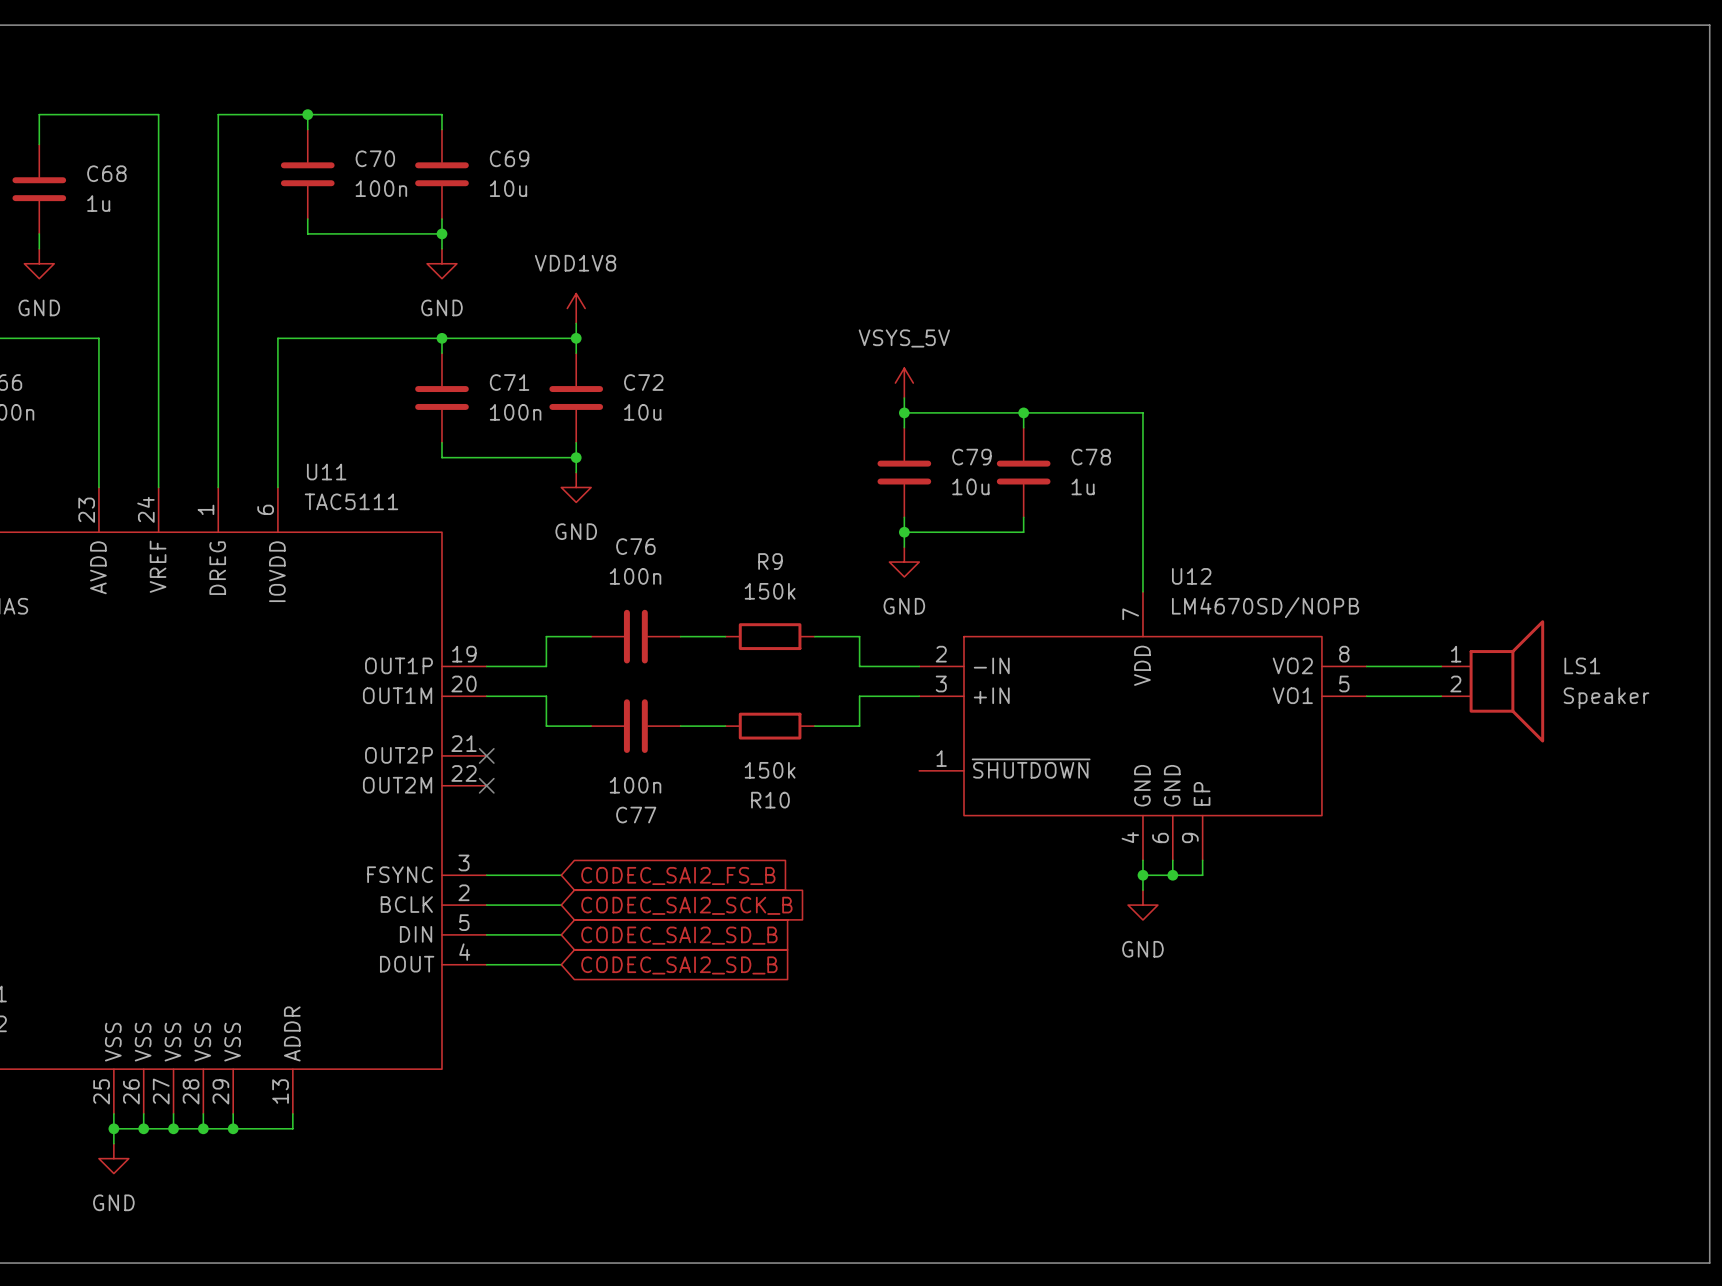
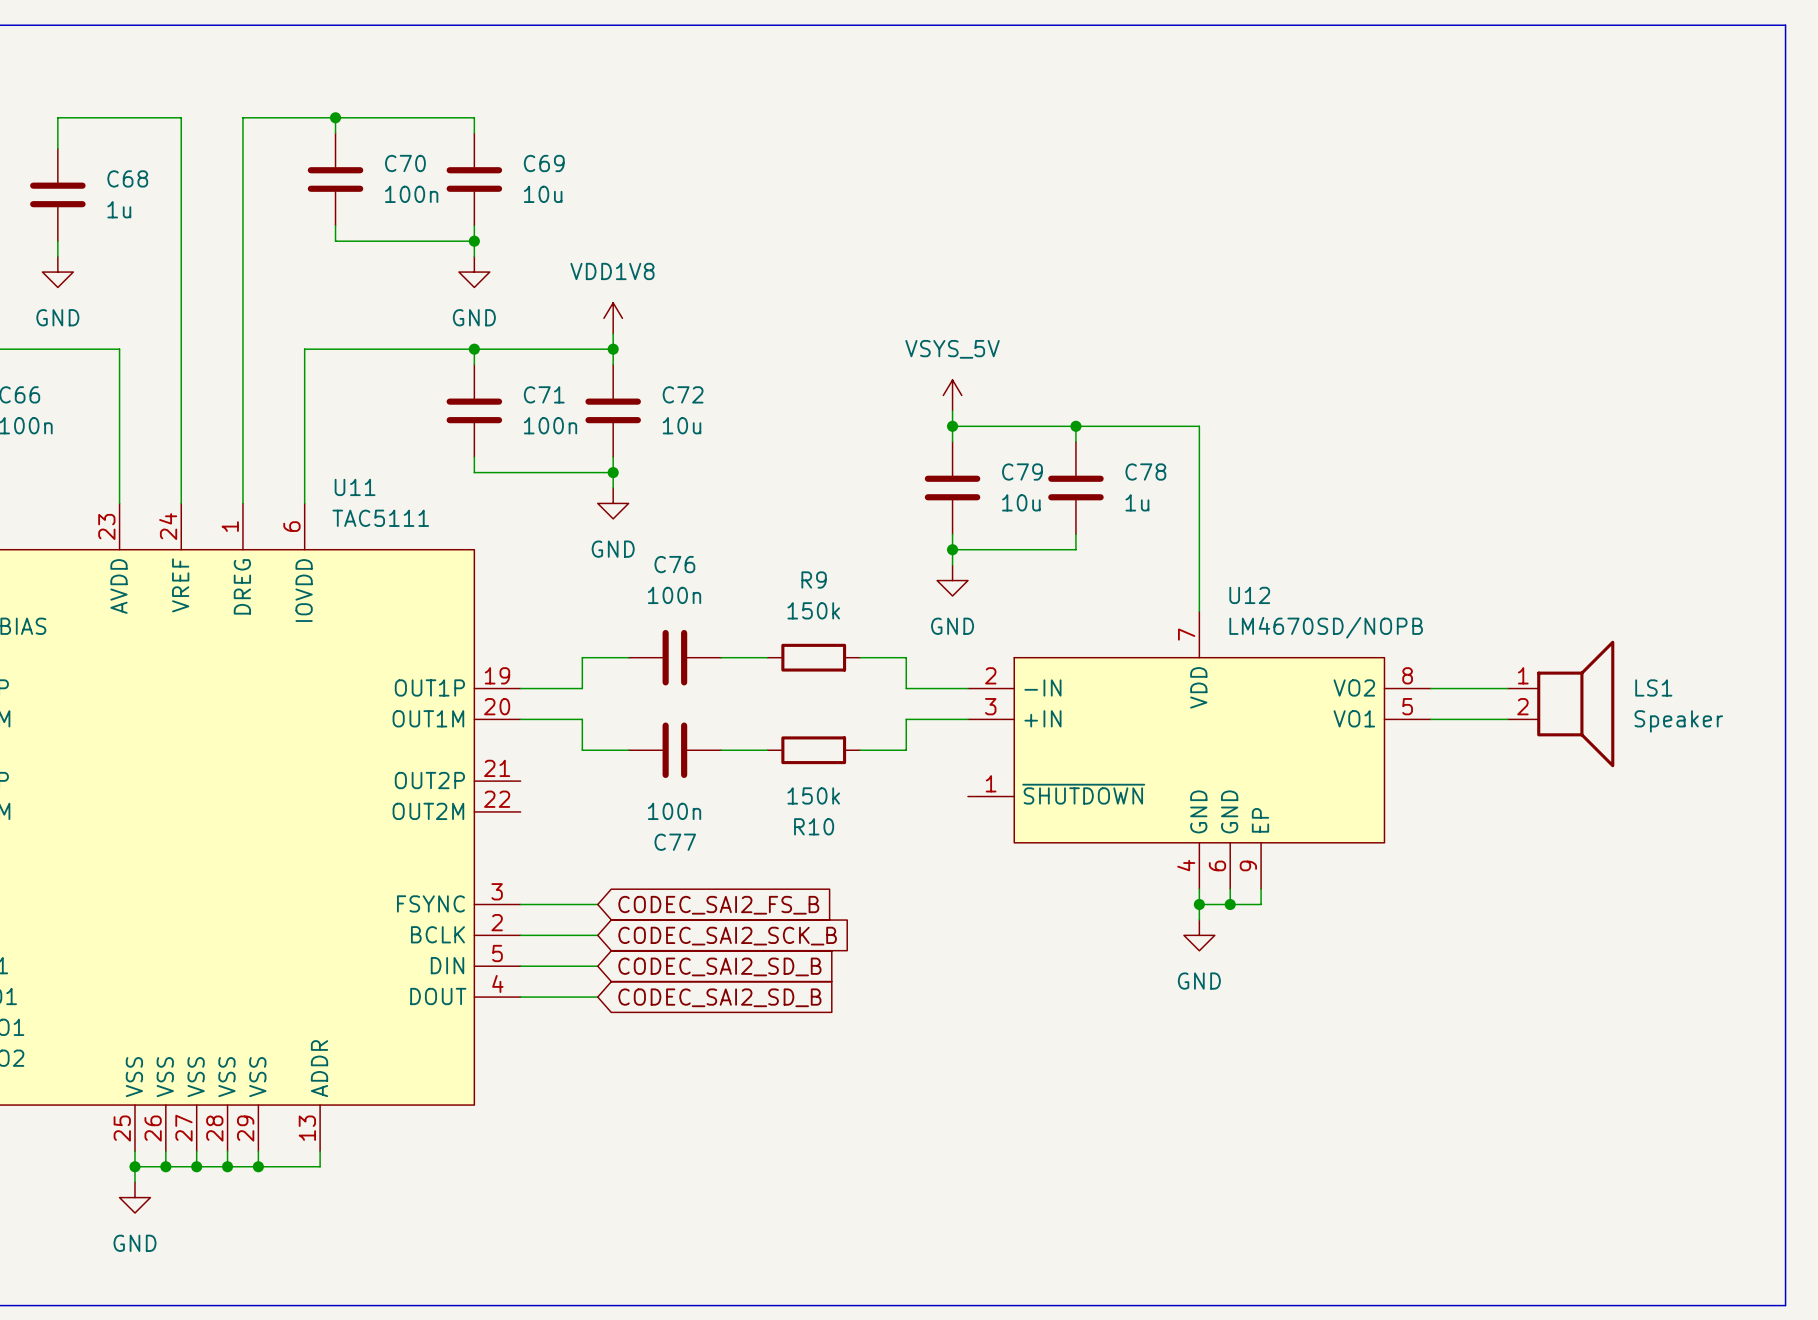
no-connect mark: (486, 755) -> none
no-connect mark: (486, 785) -> none

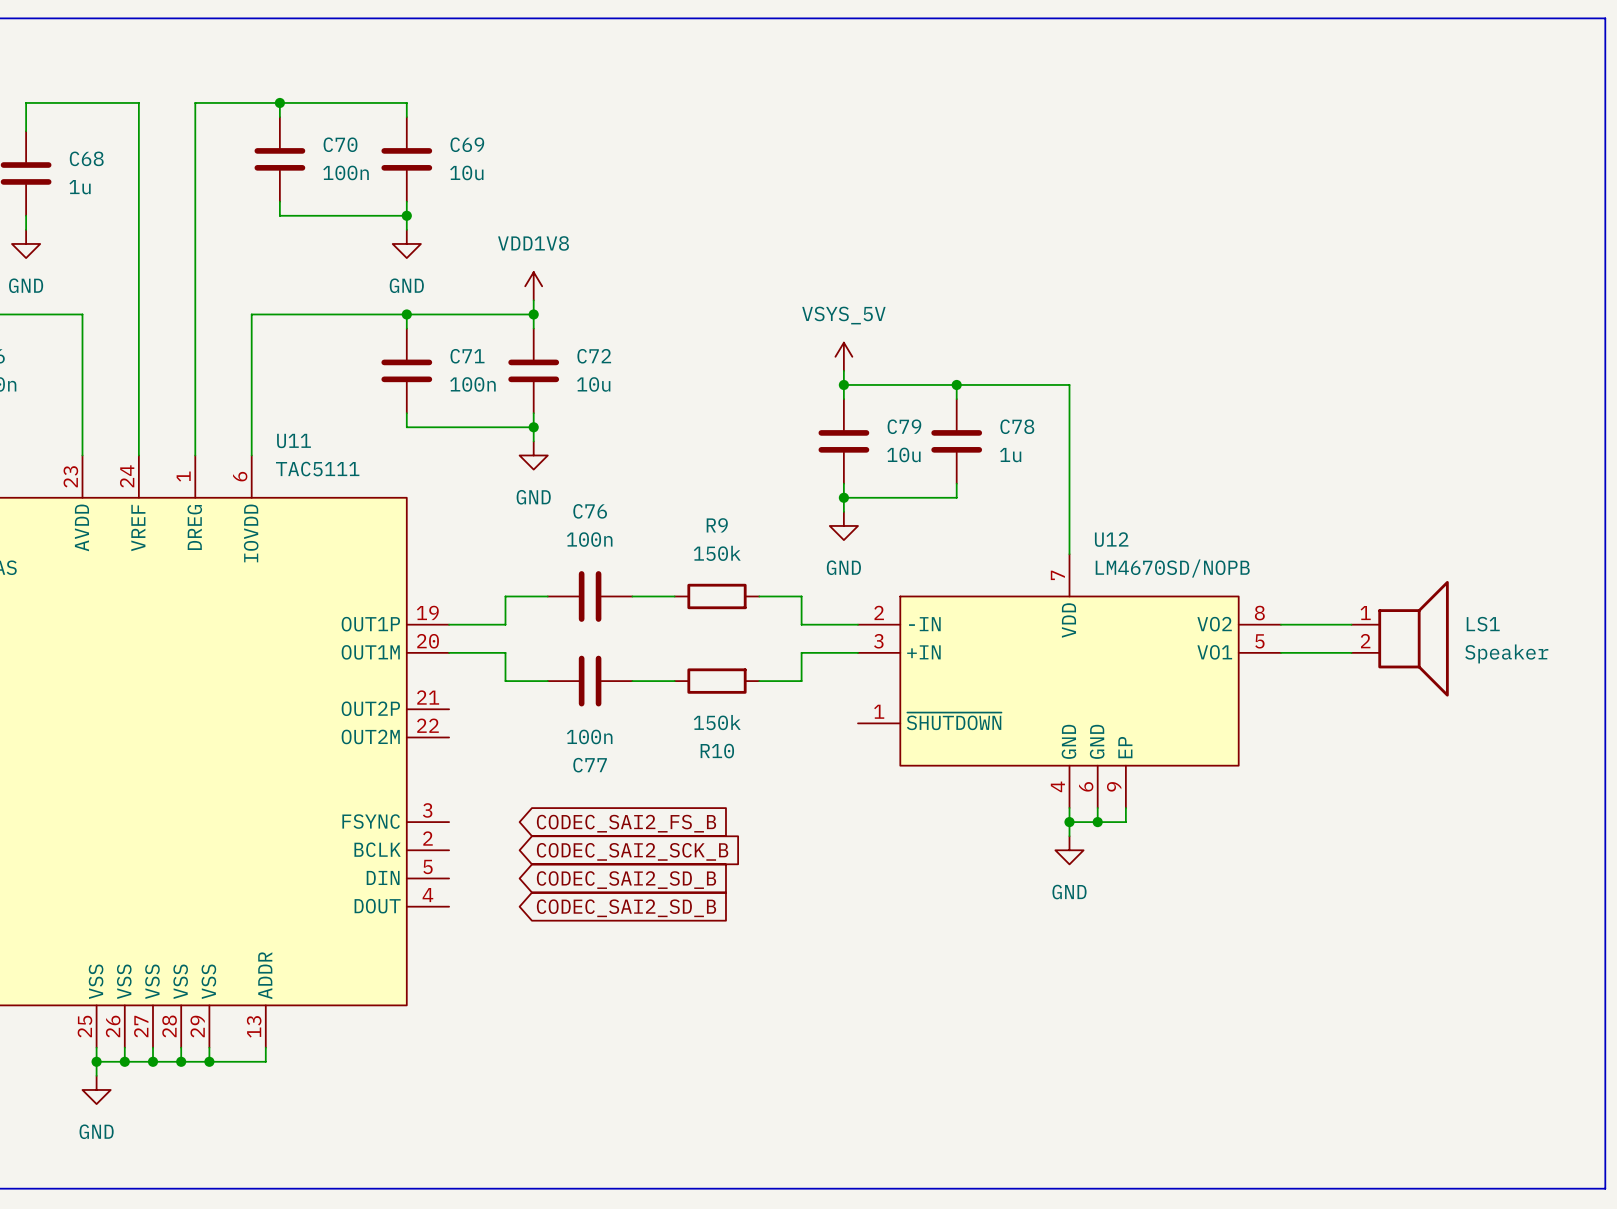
wire: (520, 904) (597, 904) -> none
wire: (520, 935) (597, 935) -> none
wire: (520, 966) (597, 966) -> none
wire: (520, 997) (597, 997) -> none

